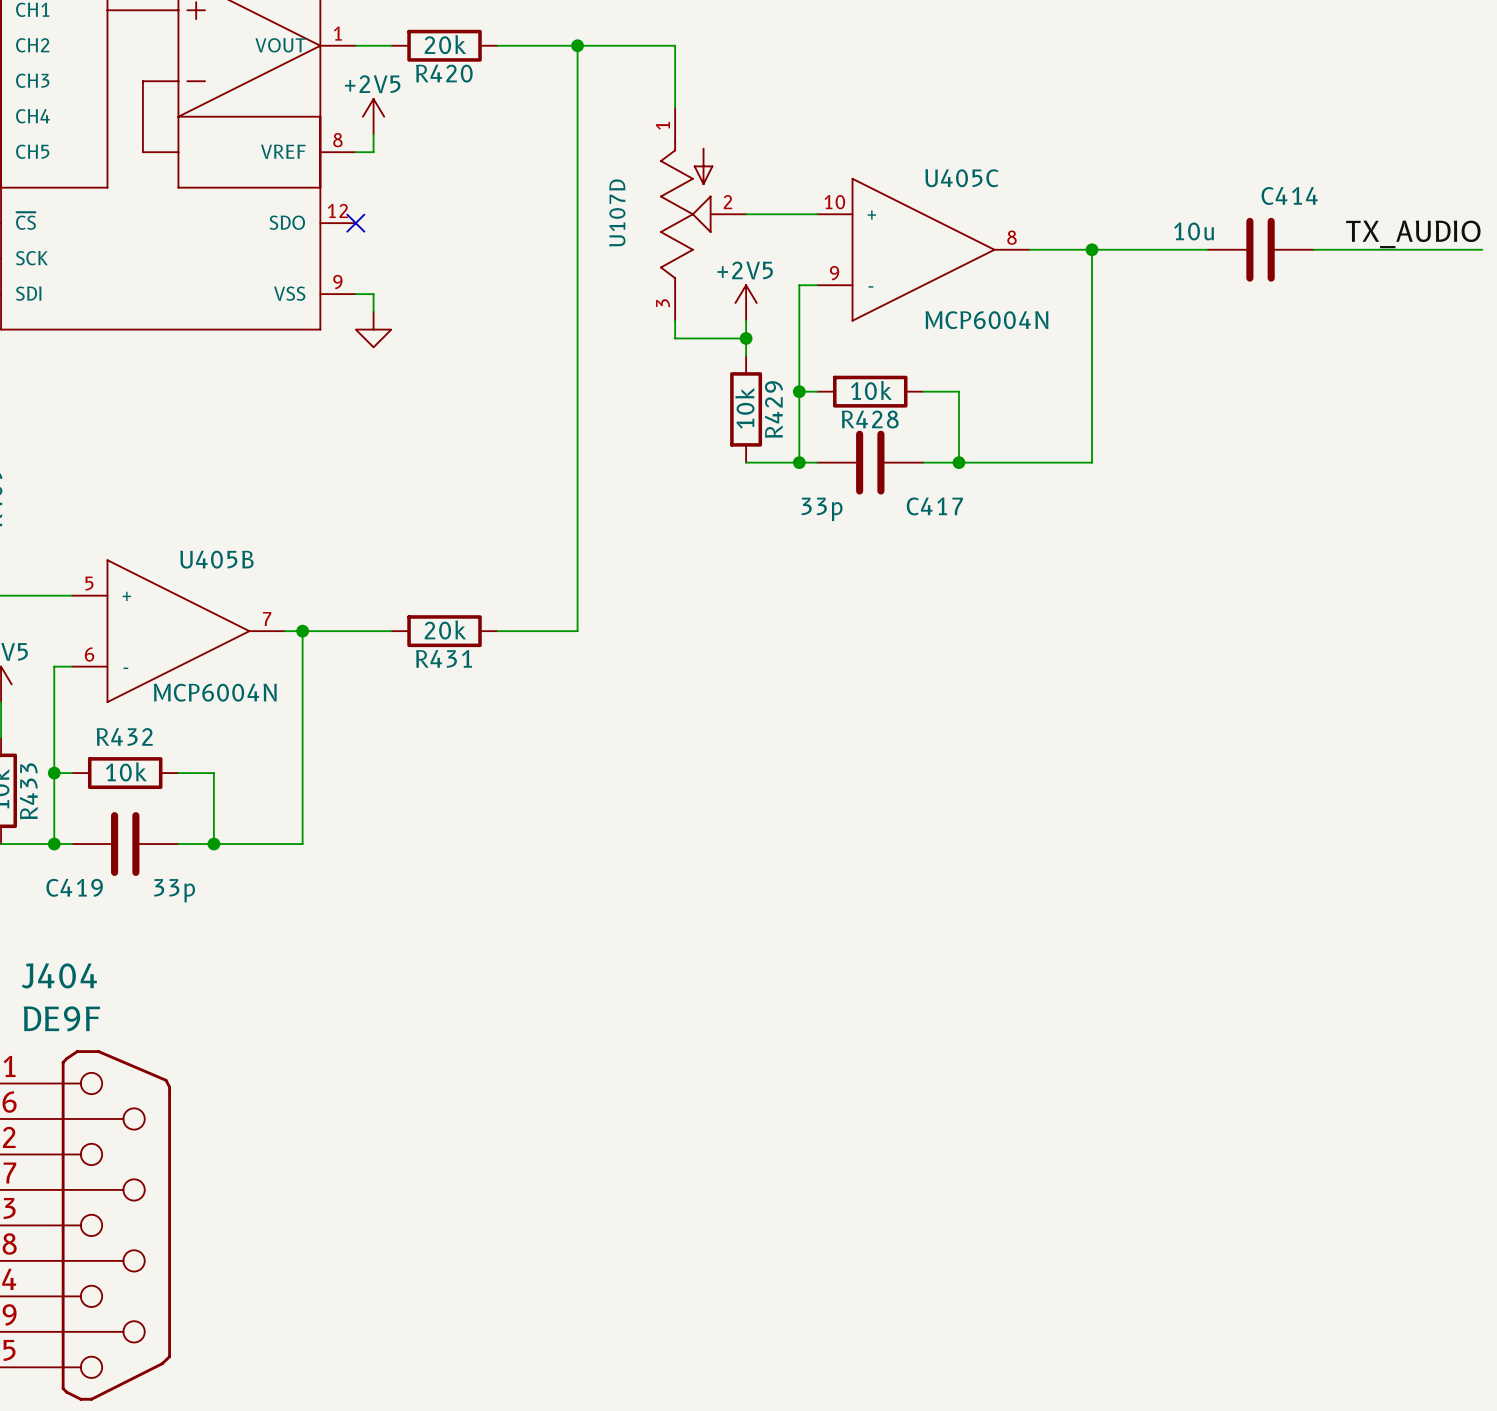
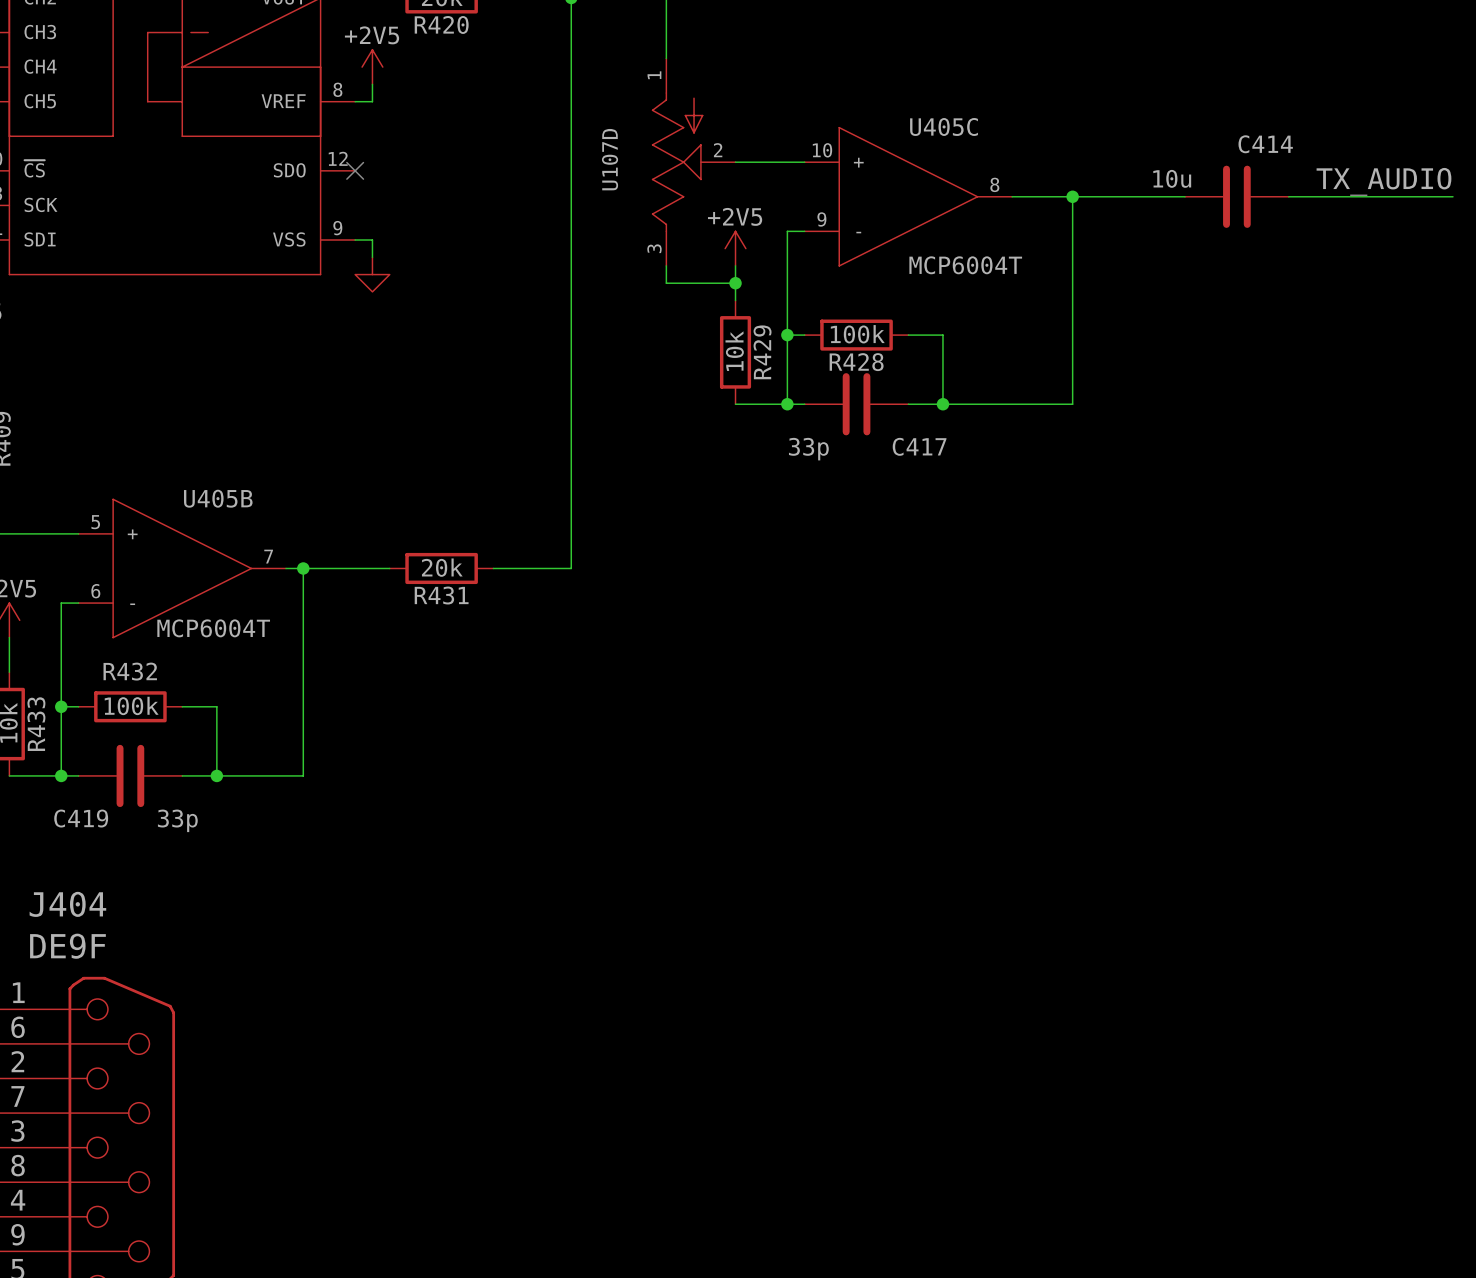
U405C value: MCP6004N (986, 320) -> MCP6004T (965, 265)
R428 value: 10k (871, 390) -> 100k (857, 334)
U405B value: MCP6004N (215, 692) -> MCP6004T (213, 628)
R432 value: 10k (126, 771) -> 100k (131, 705)

